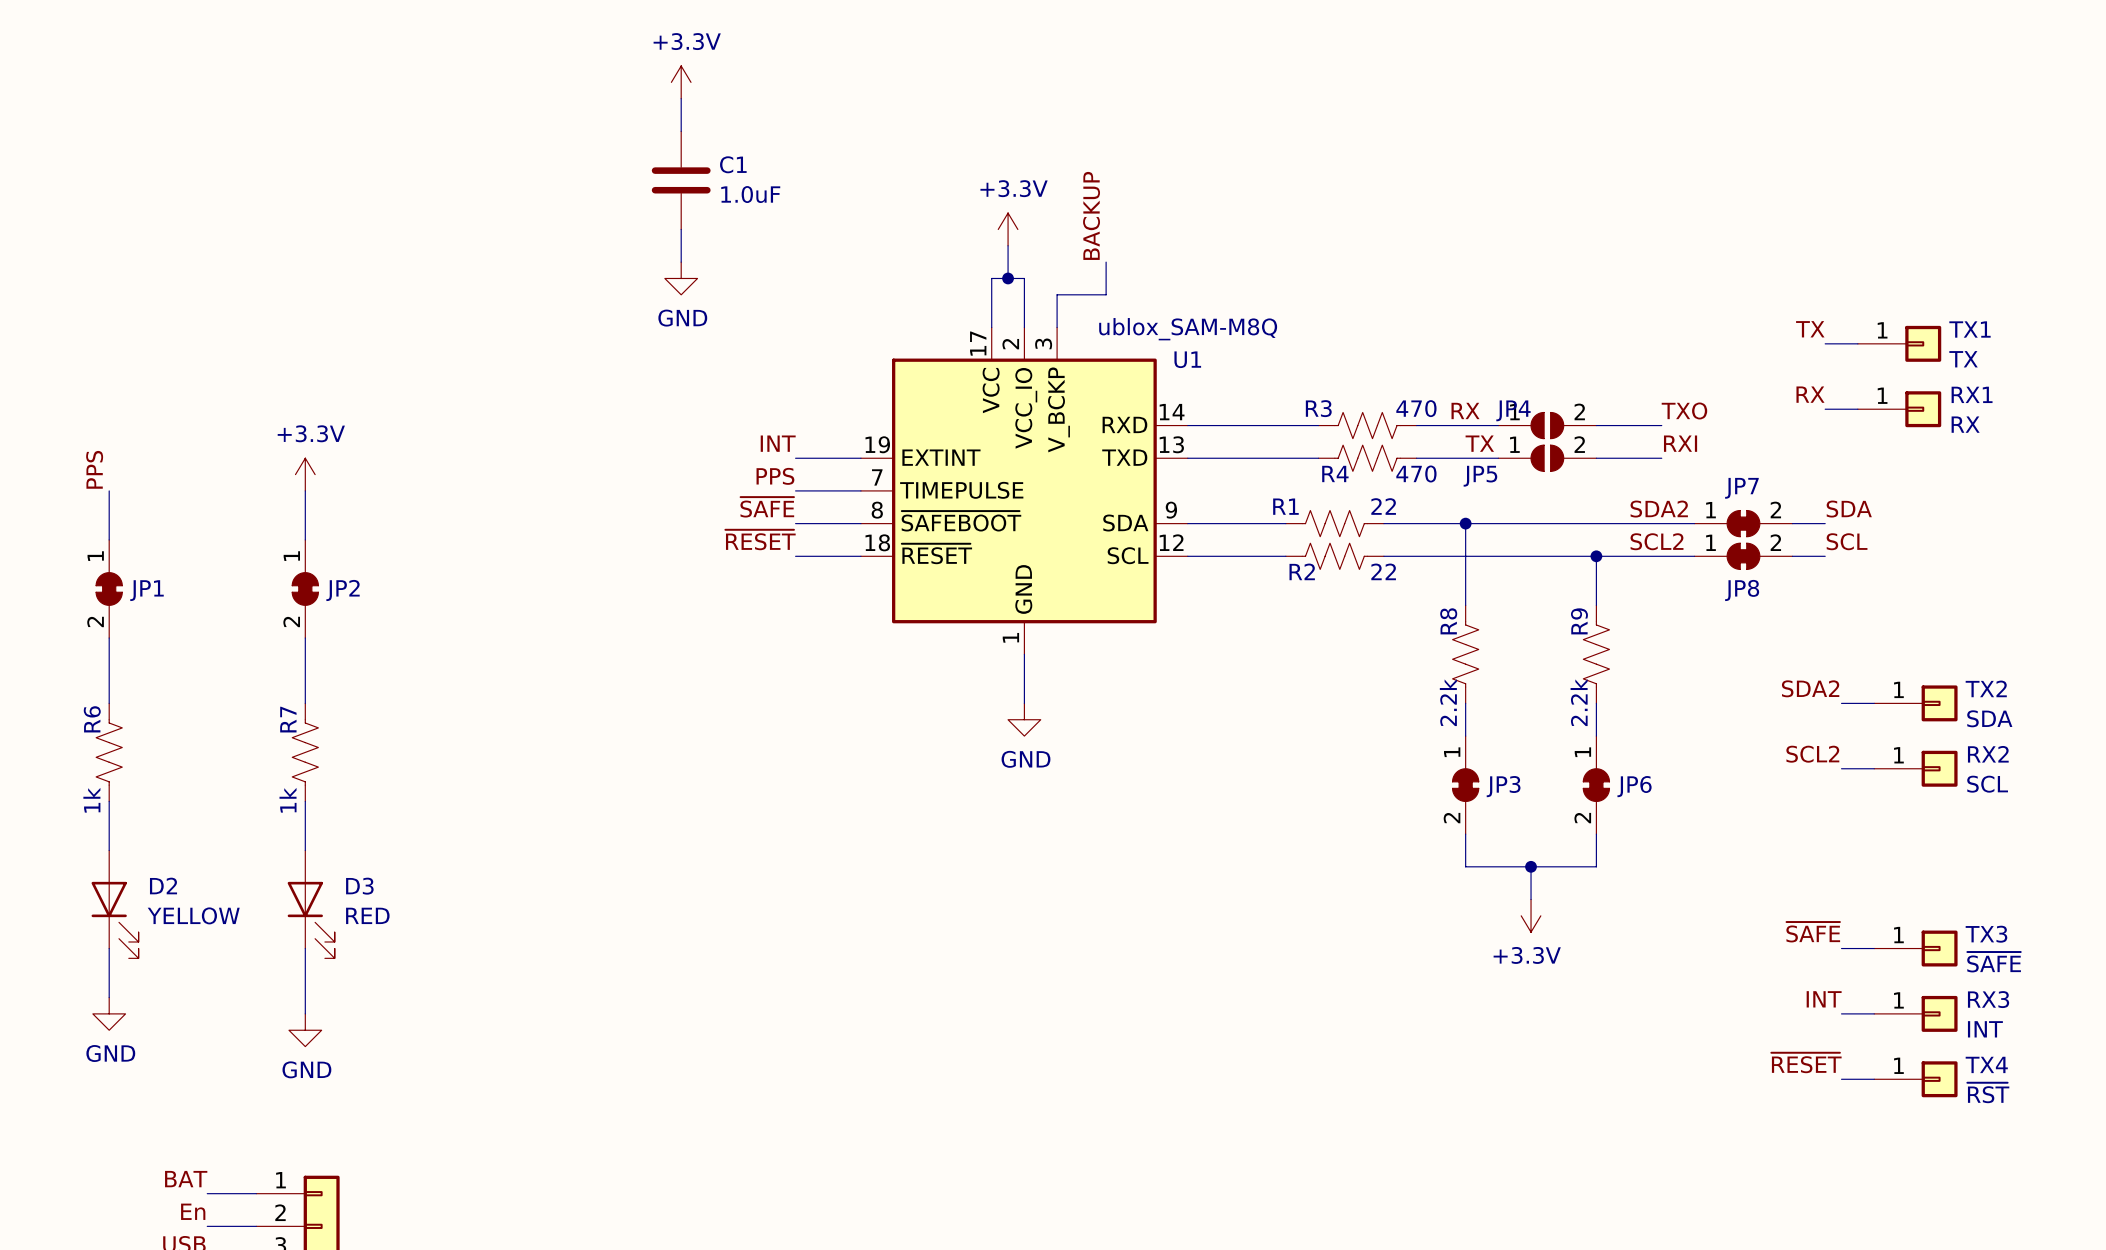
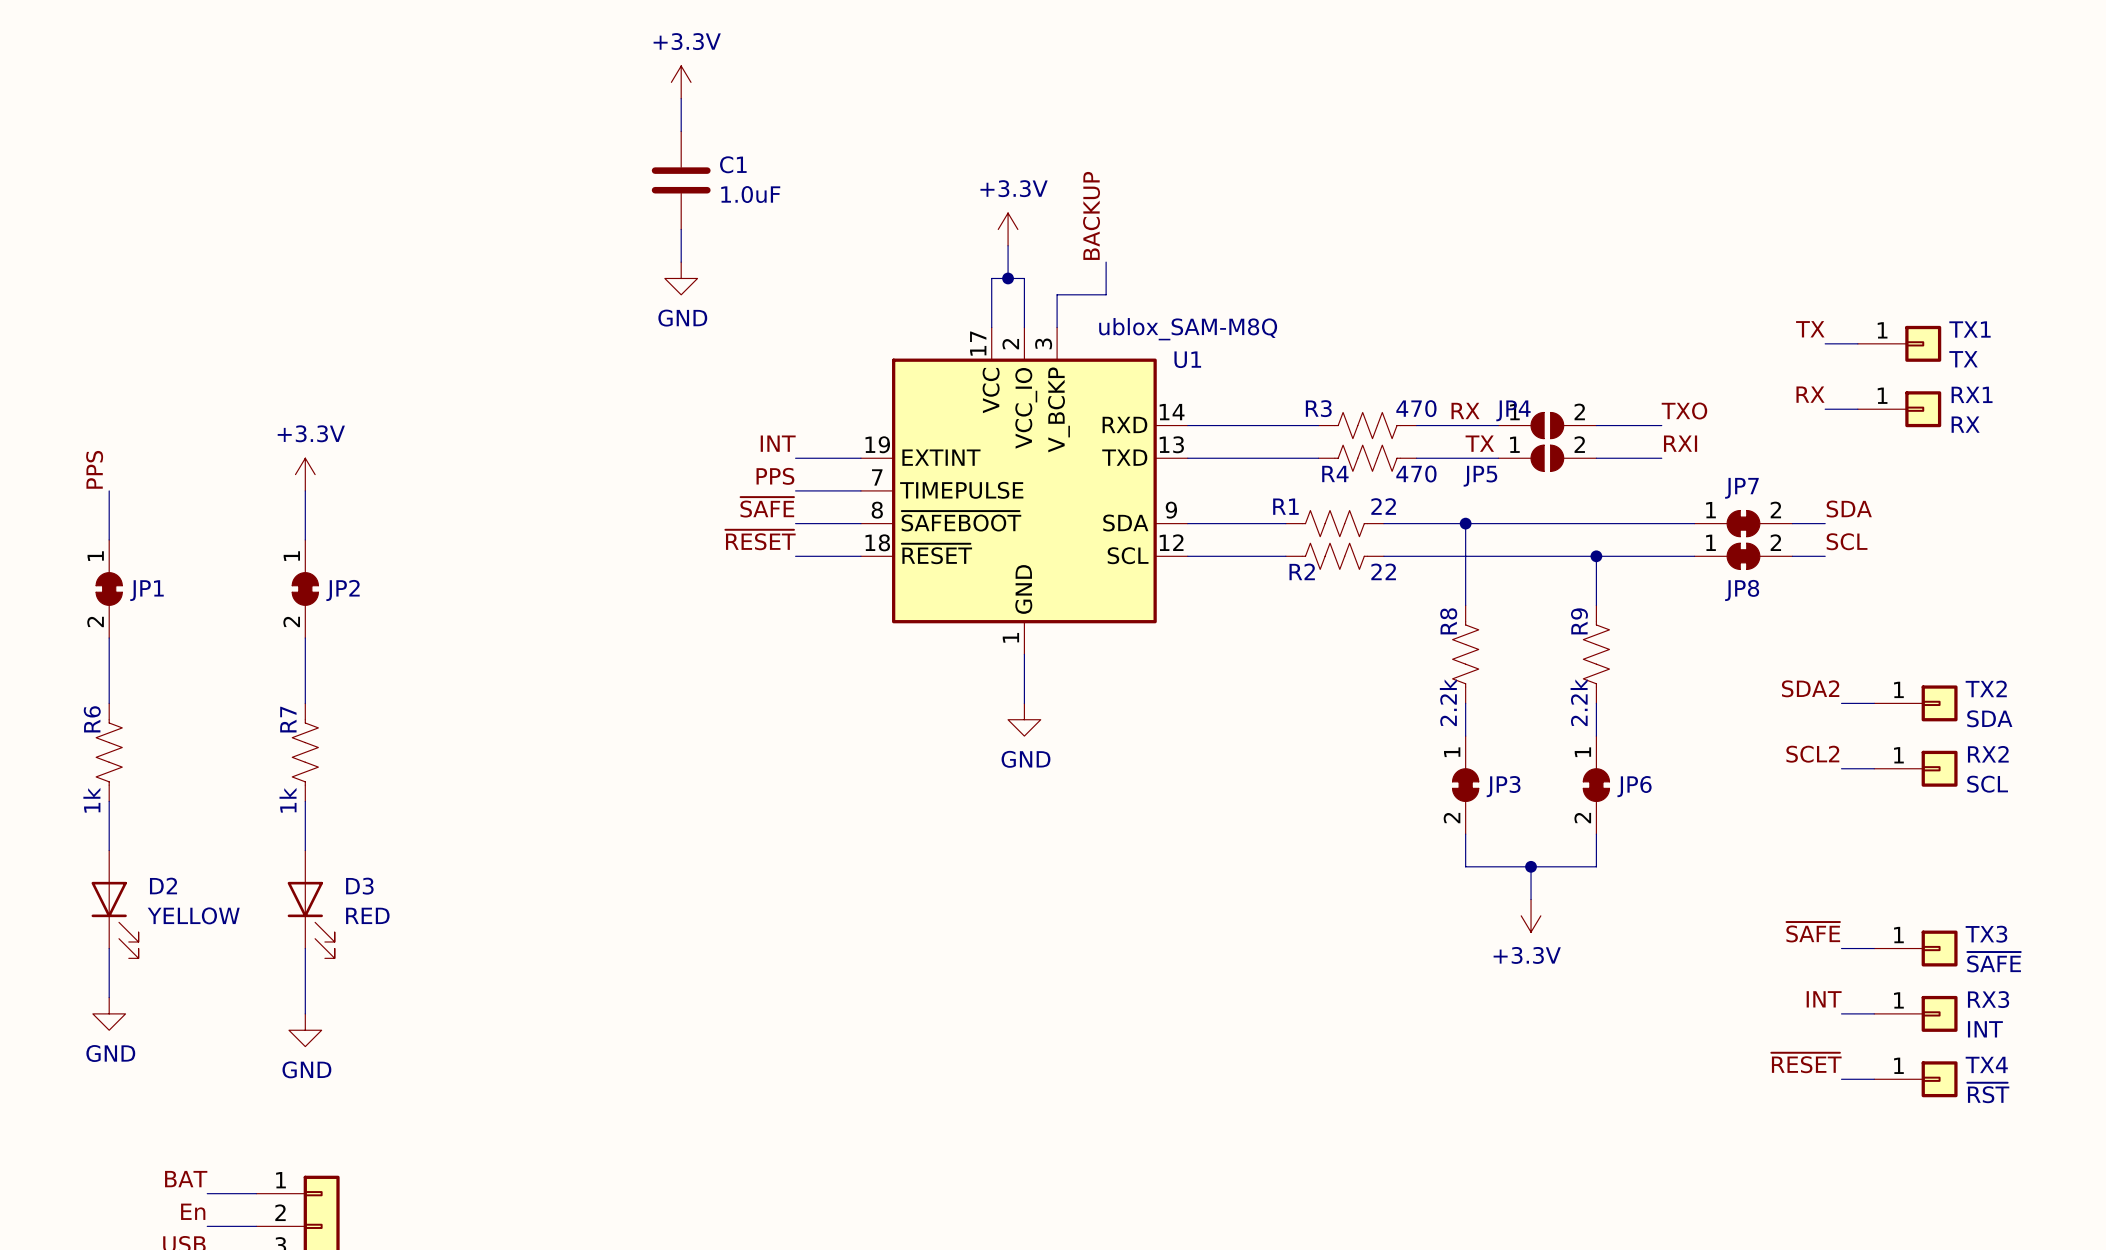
label: SDA2 (1659, 509) -> none
label: SCL2 (1657, 541) -> none

